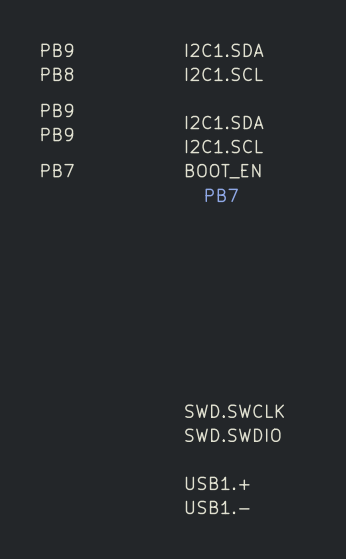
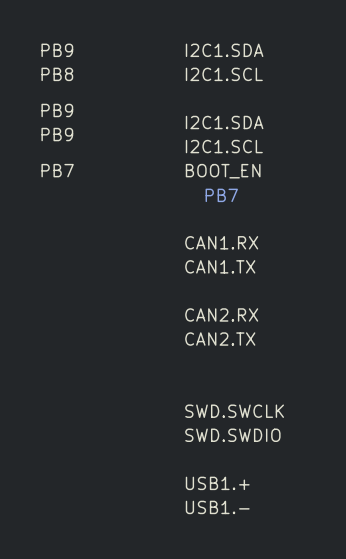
label: none -> CAN1.RX (221, 242)
label: none -> CAN1.TX (220, 266)
label: none -> CAN2.RX (221, 314)
label: none -> CAN2.TX (220, 339)

